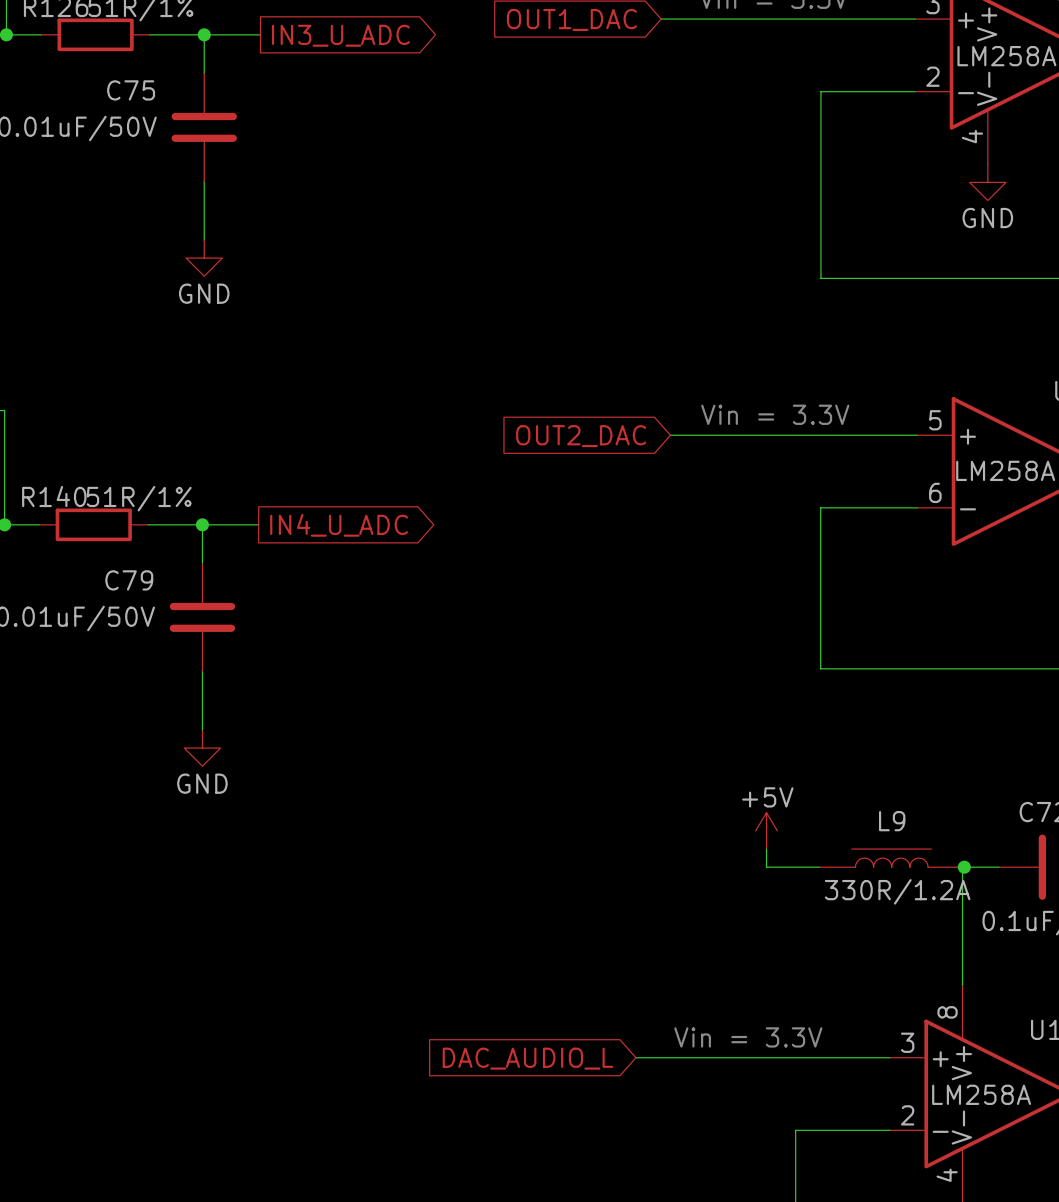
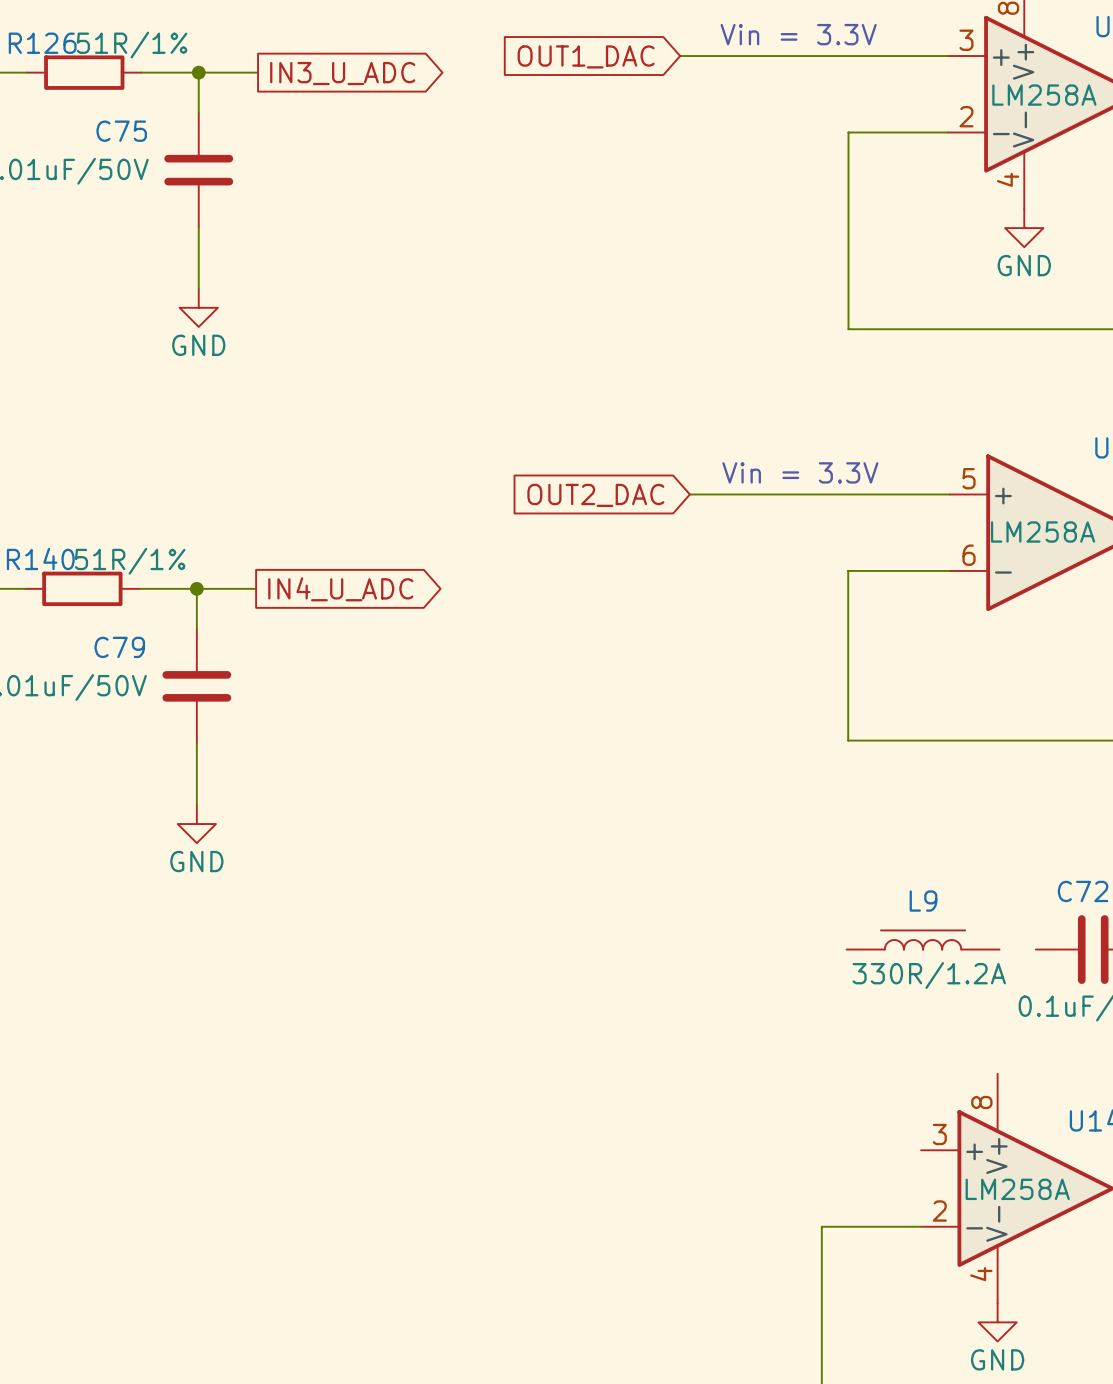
power symbol: +5V (766, 830) -> none
wire: (766, 849) (766, 867) (819, 867) -> none
junction: (964, 867) -> none
wire: (998, 867) (962, 867) (962, 985) -> none
text: Vin = 3.3V (748, 1037) -> none
wire: (635, 1057) (889, 1057) -> none
global label: DAC_AUDIO_L (528, 1058) -> none

